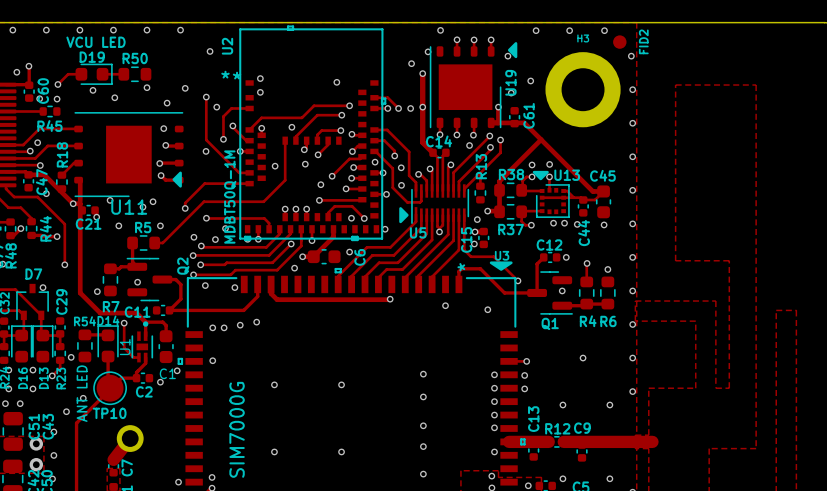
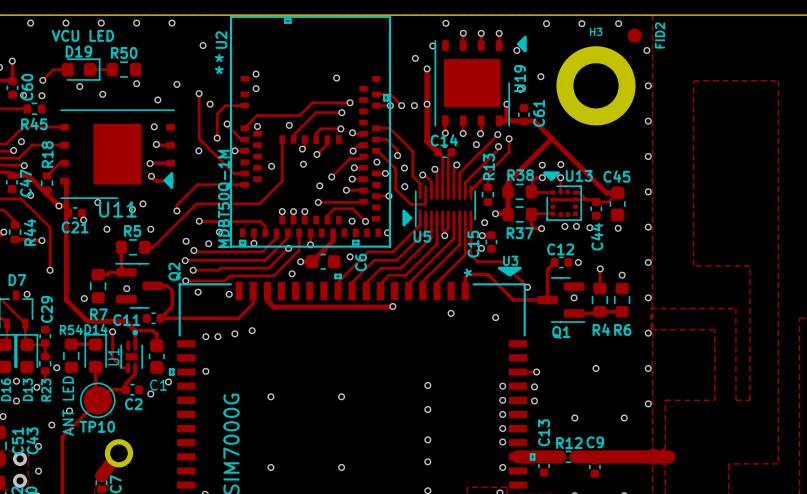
U2 footprint: [239, 25, 387, 242] -> [229, 15, 392, 248]

